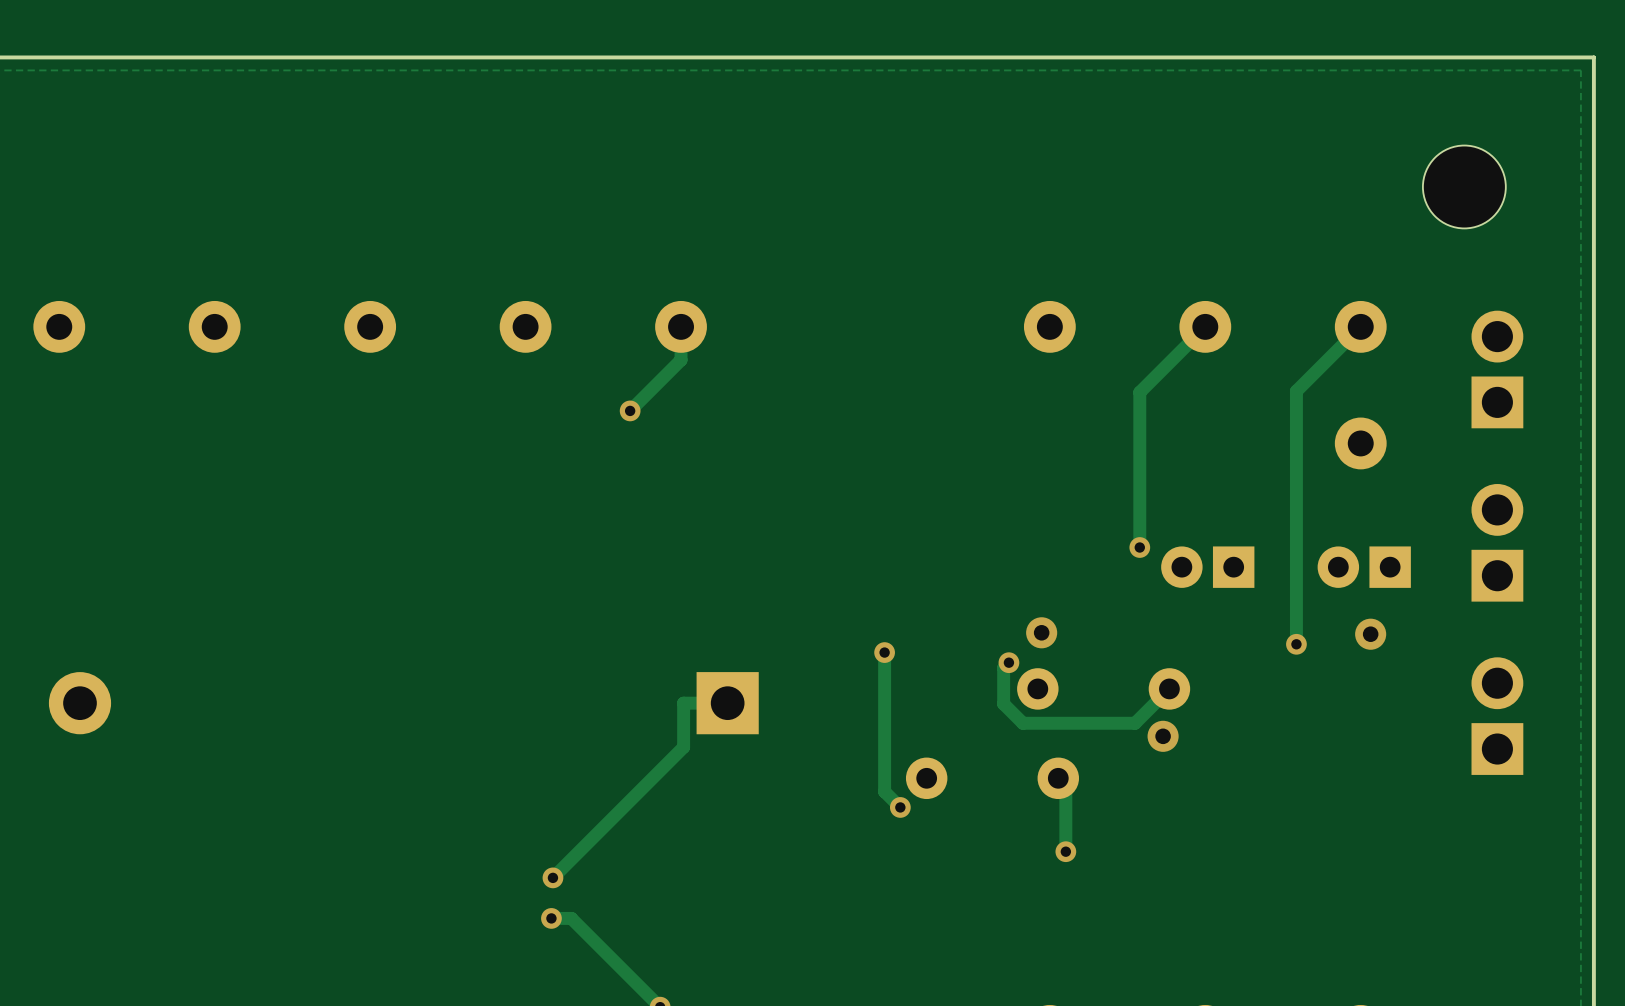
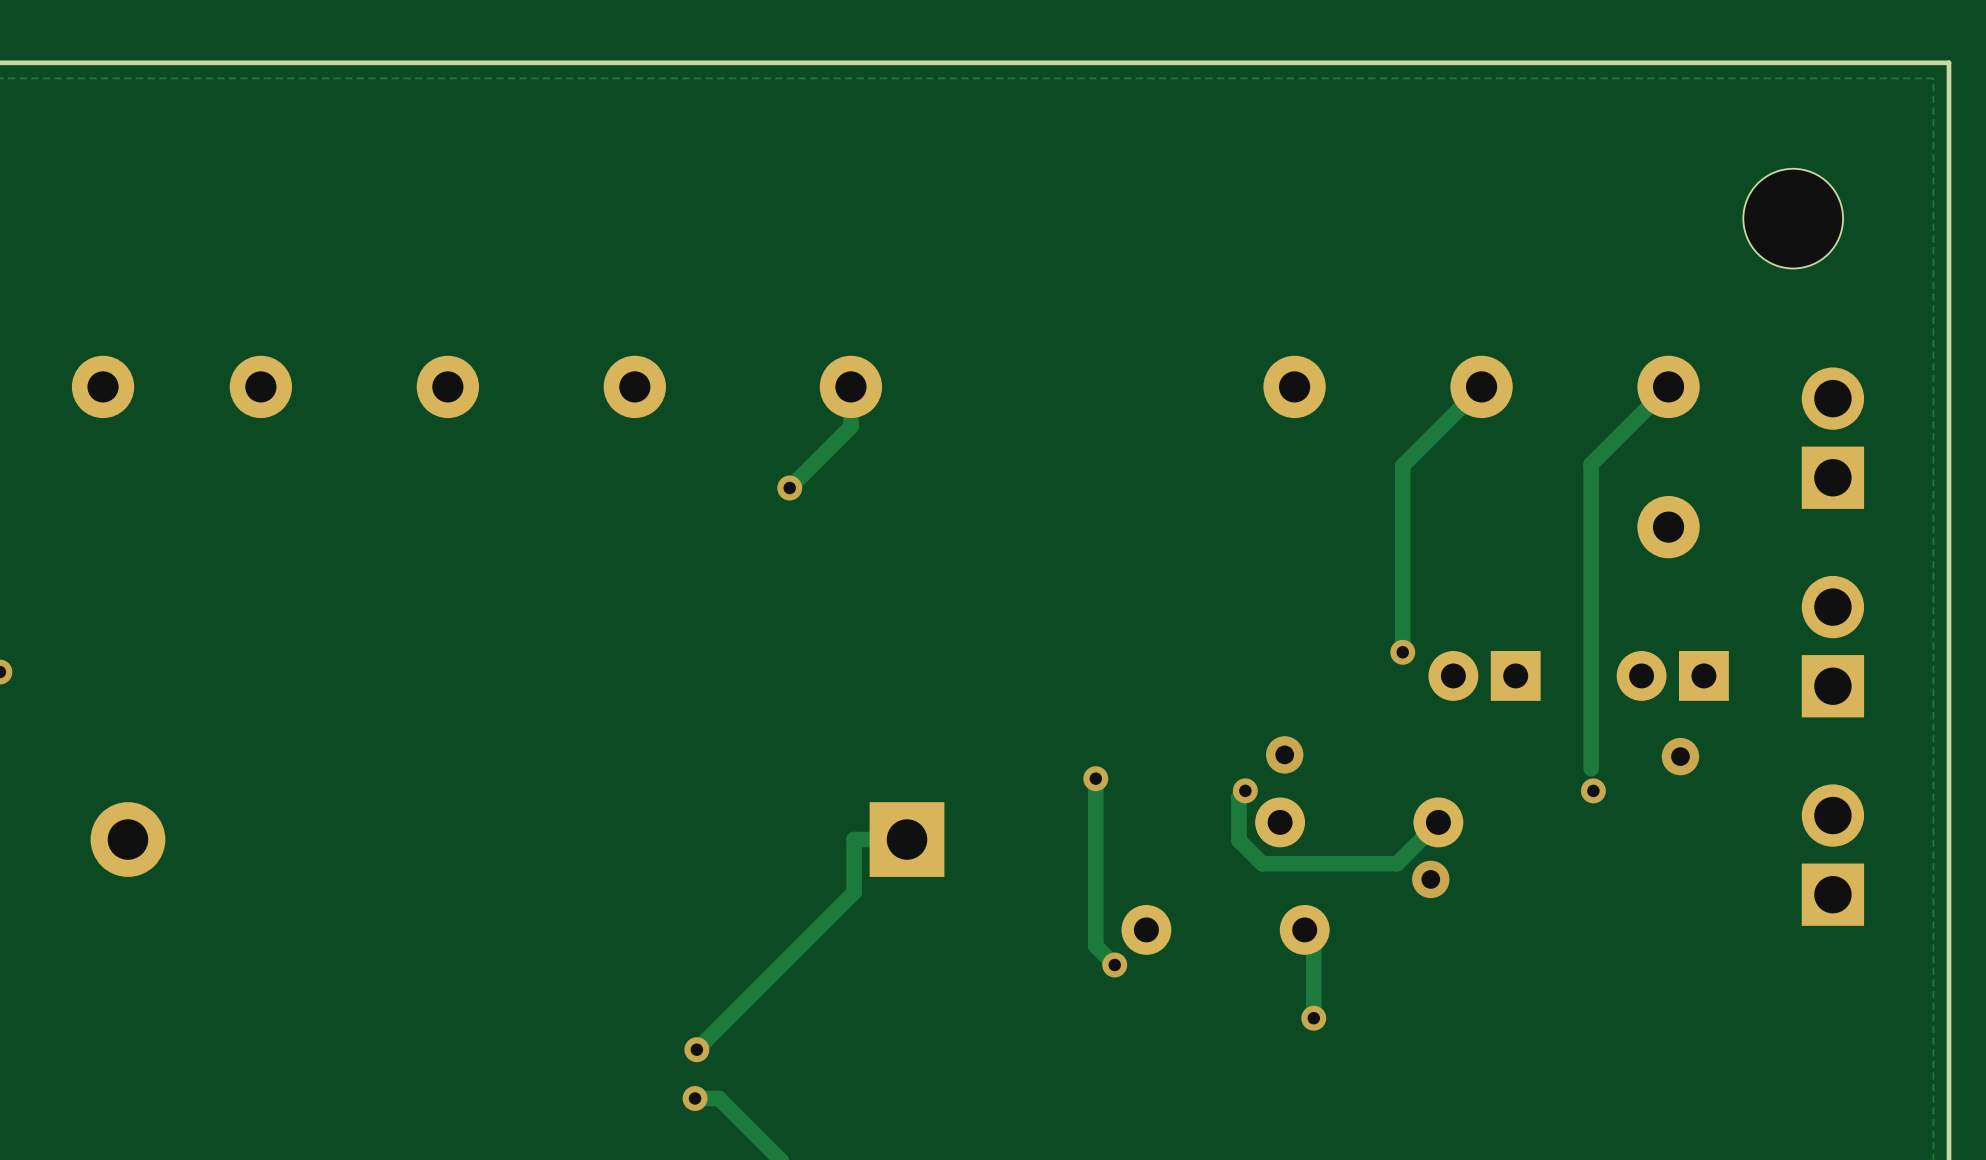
part position: (214, 326) -> (260, 386)
part position: (370, 326) -> (447, 386)
part position: (525, 326) -> (634, 386)
via position: (1296, 644) -> (1593, 790)

